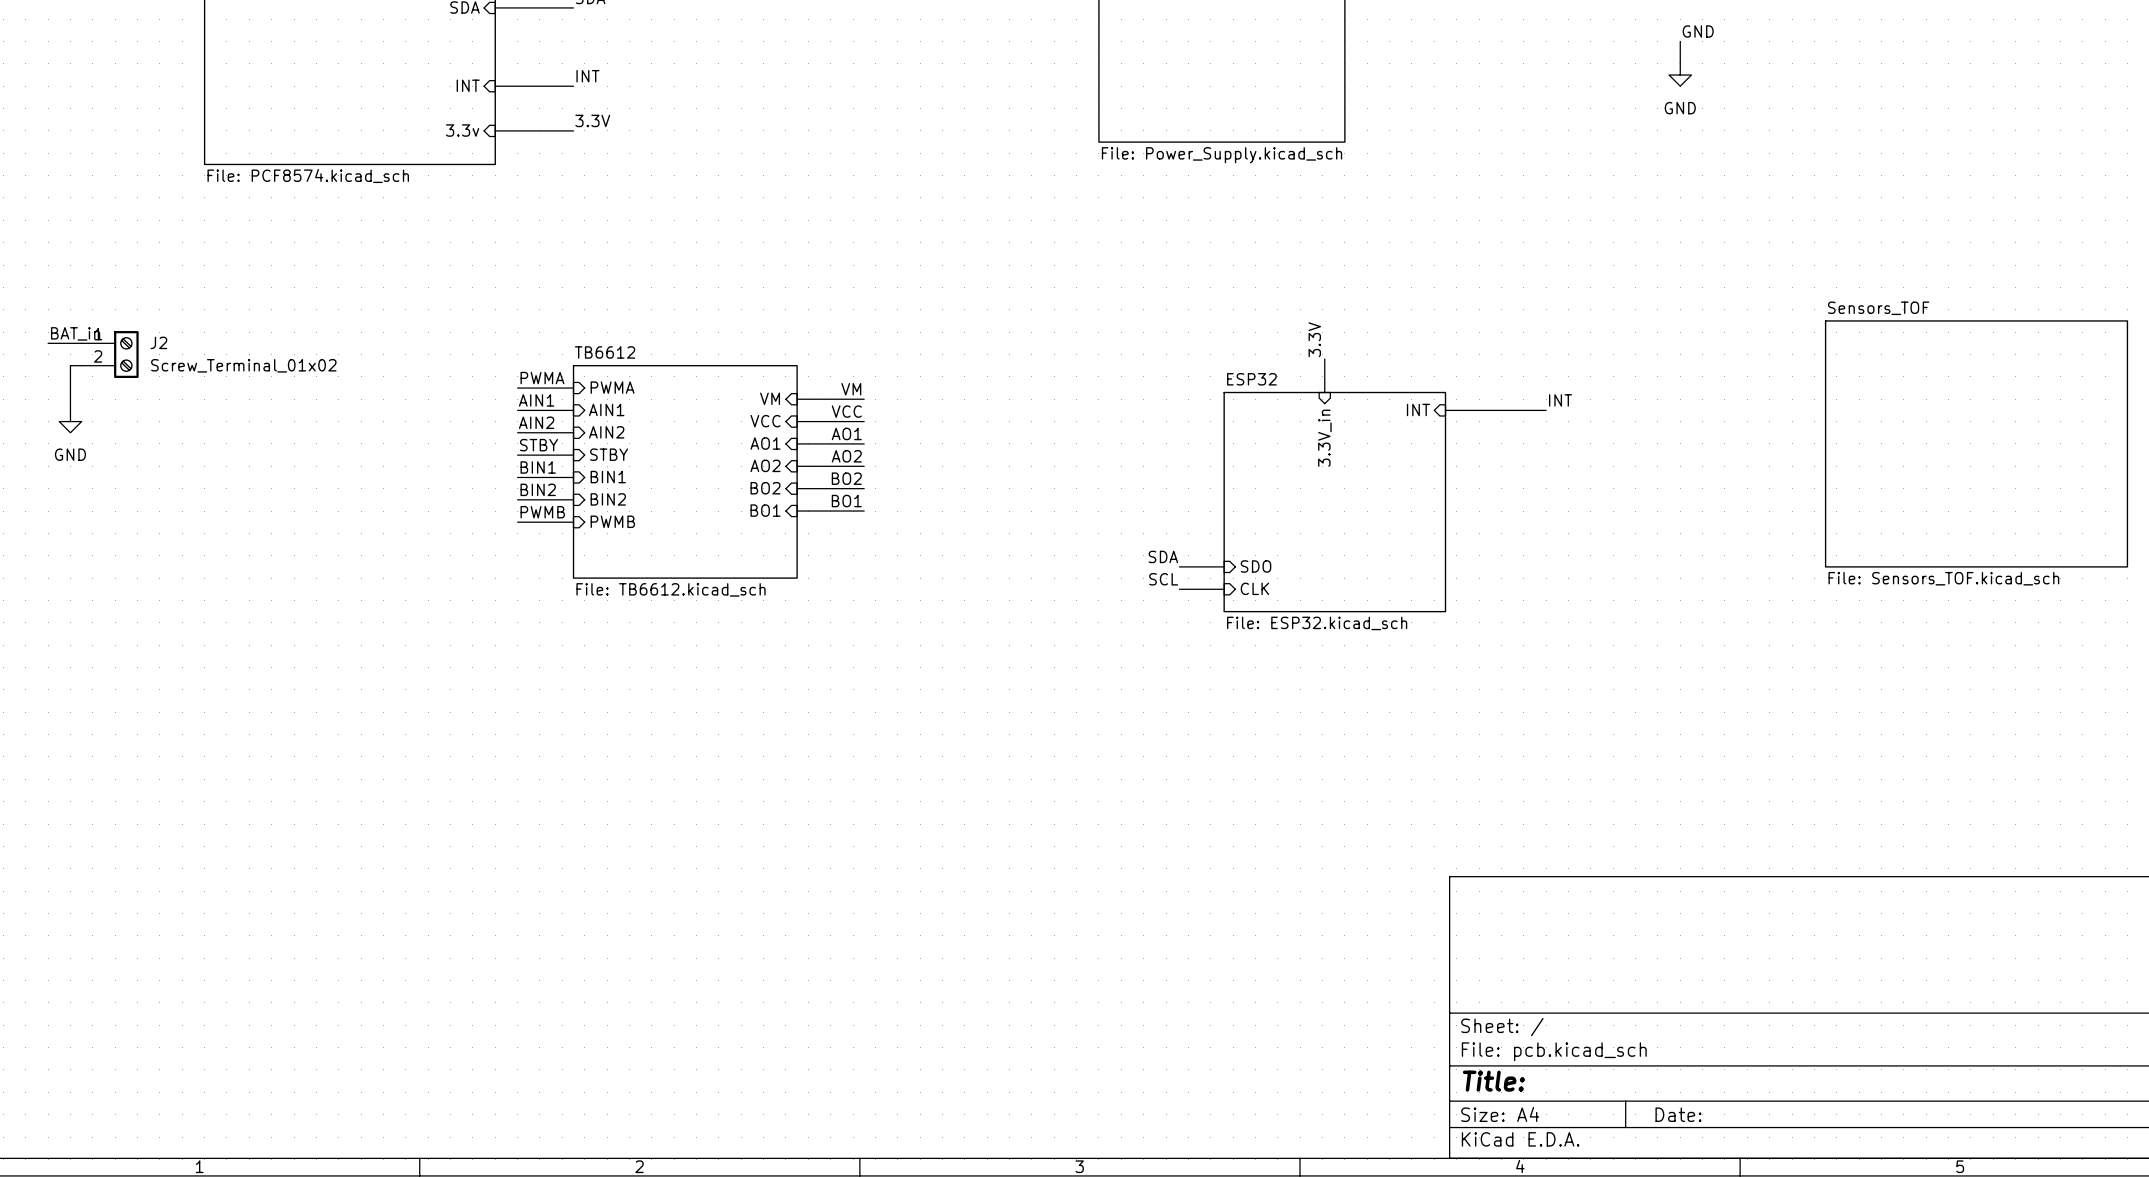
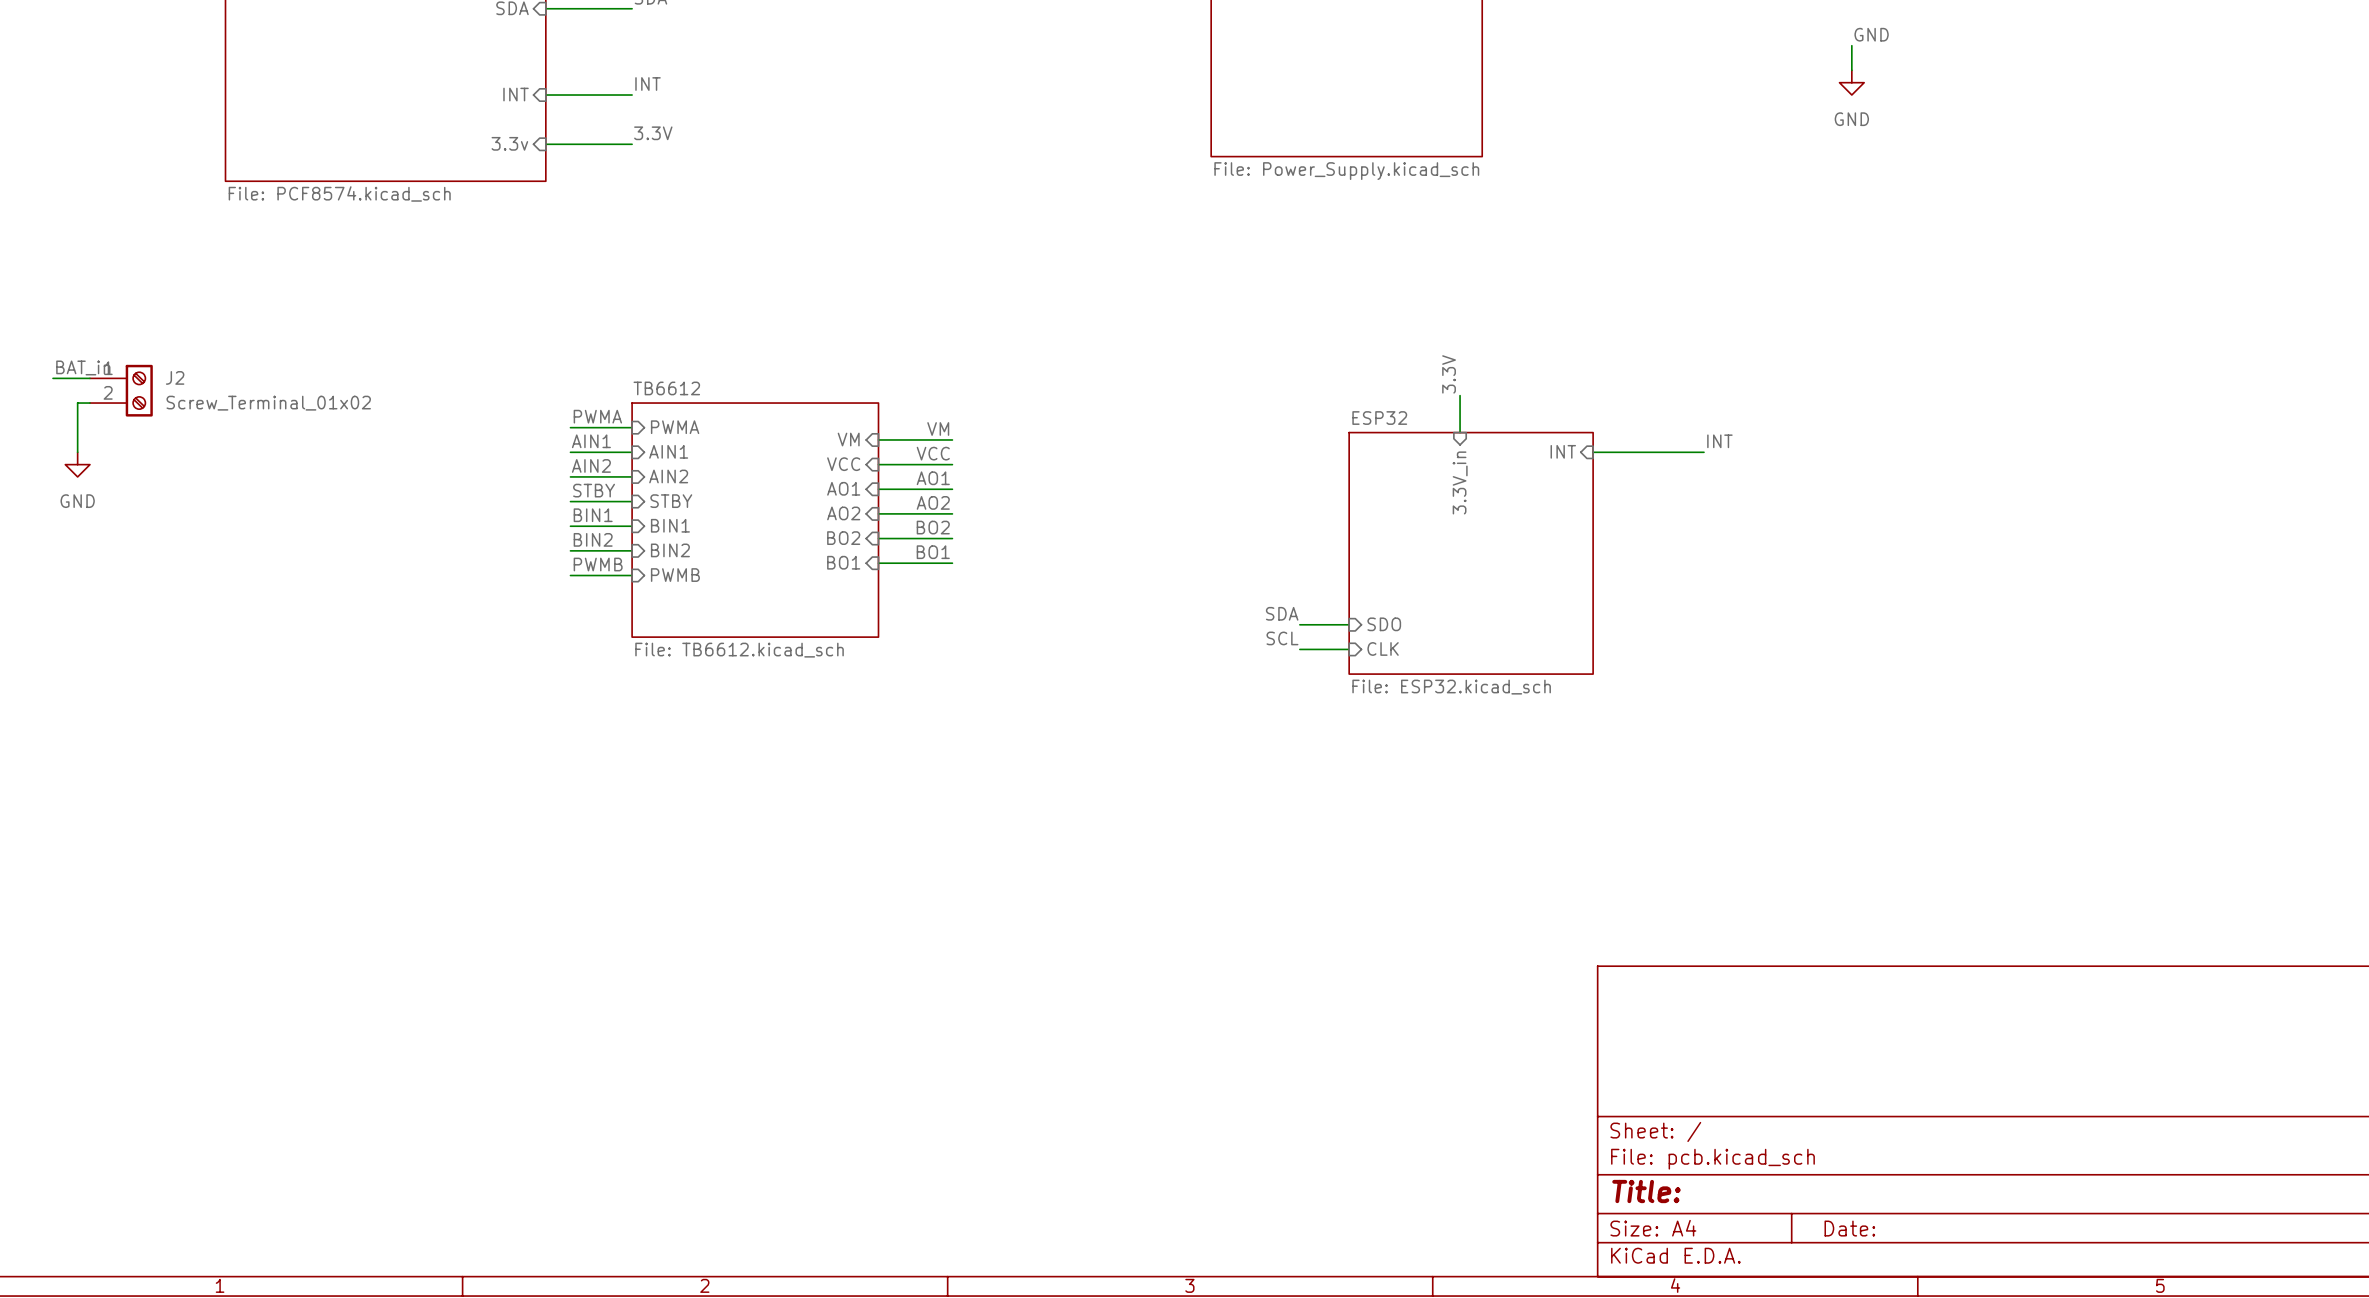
sheet Sensors_TOF: File: Sensors_TOF.kicad_sch (1976, 443) -> none

